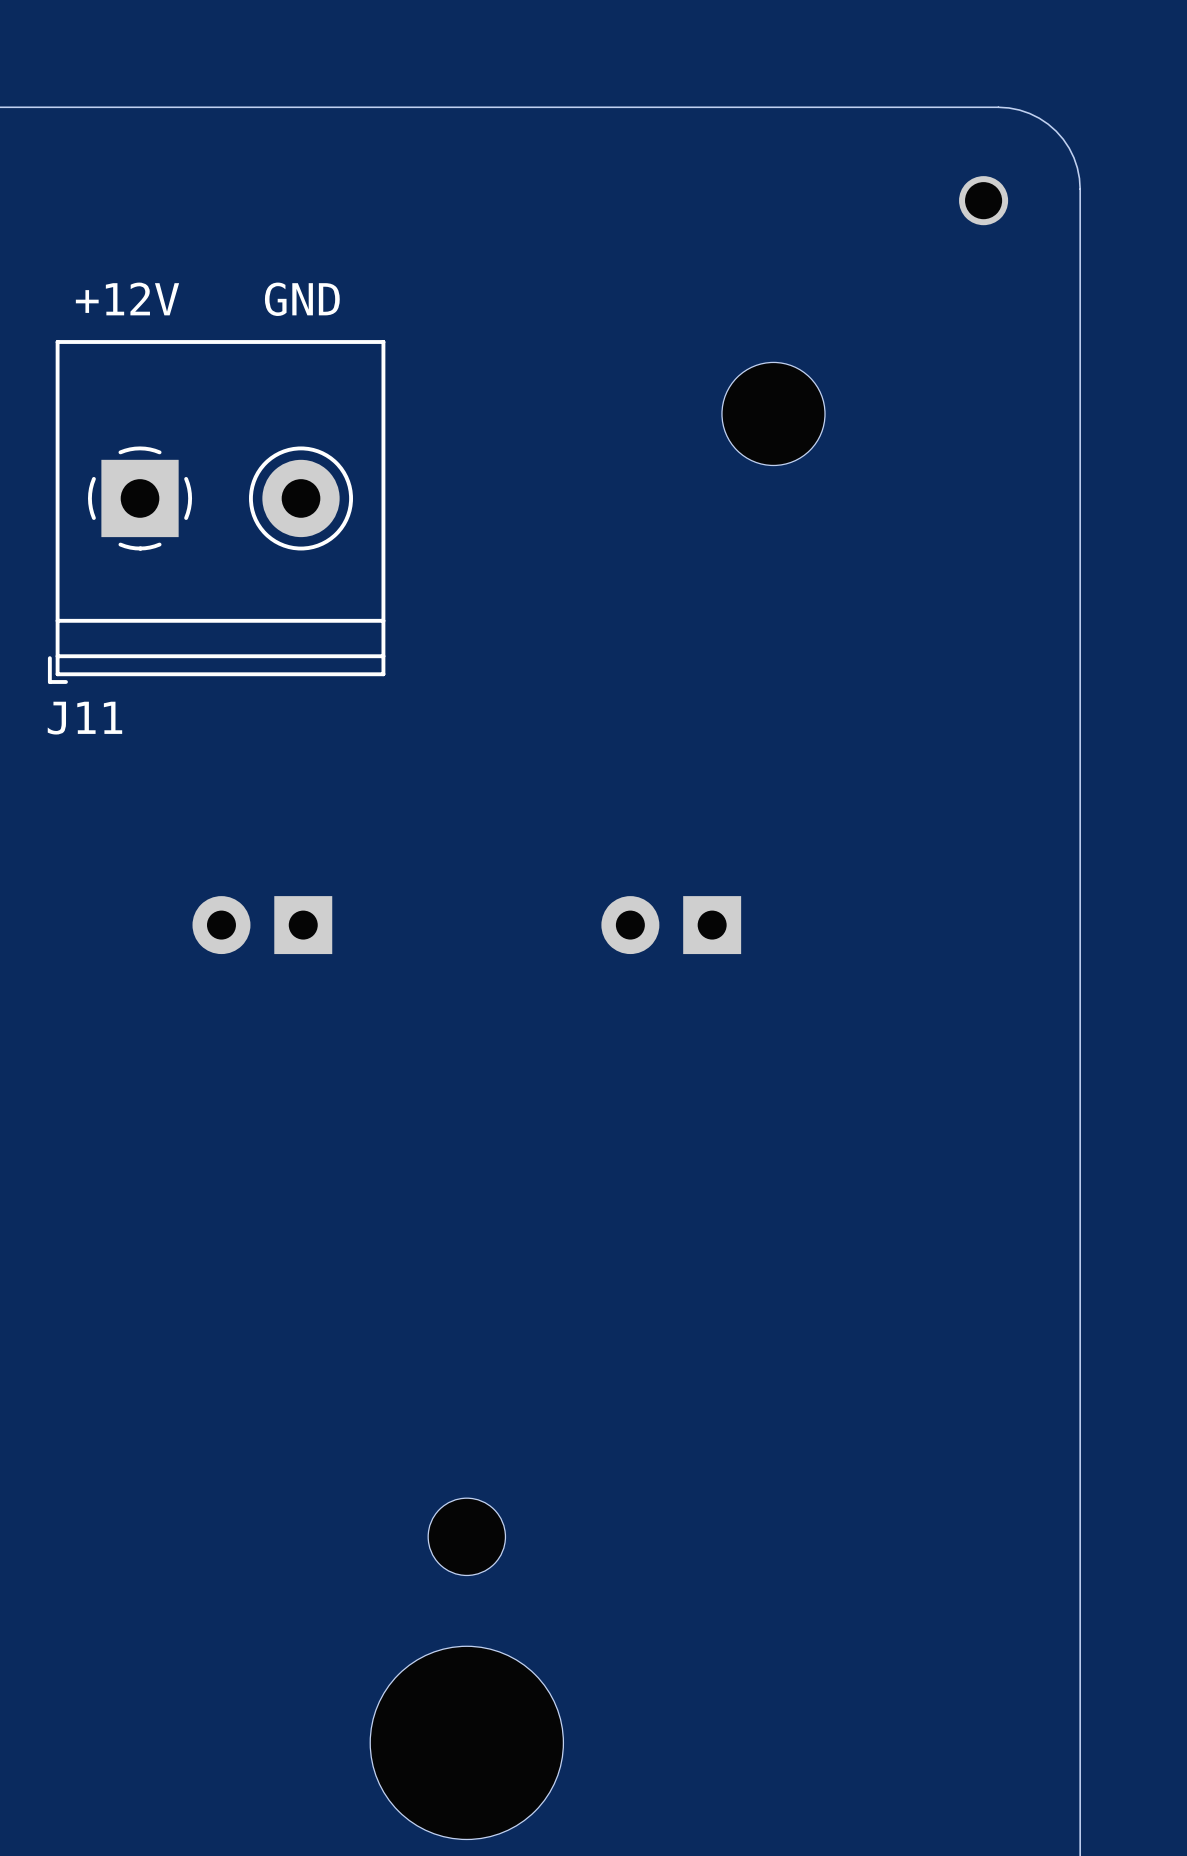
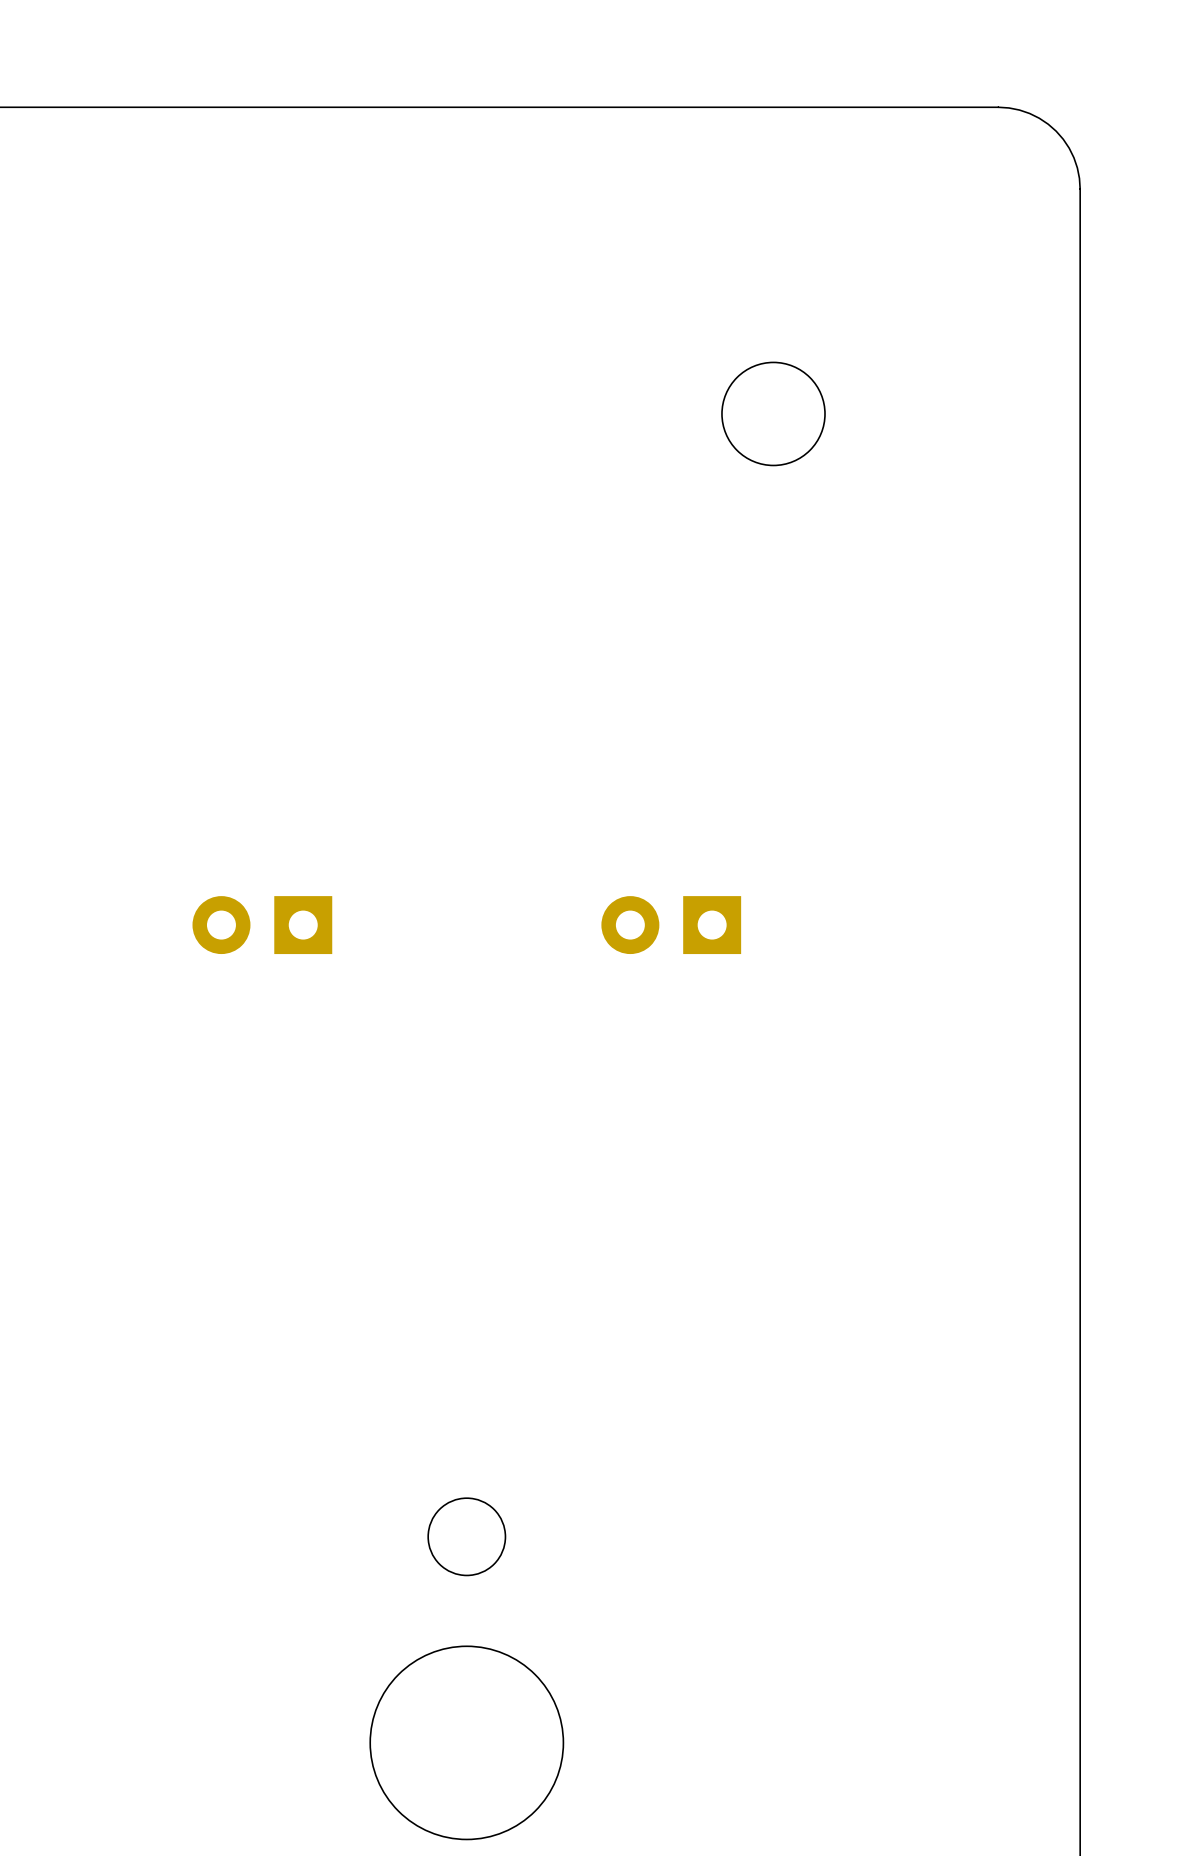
part: (983, 200) -> none
text: +12V (127, 298) -> none
text: GND (302, 299) -> none
J11: (216, 511) -> none

